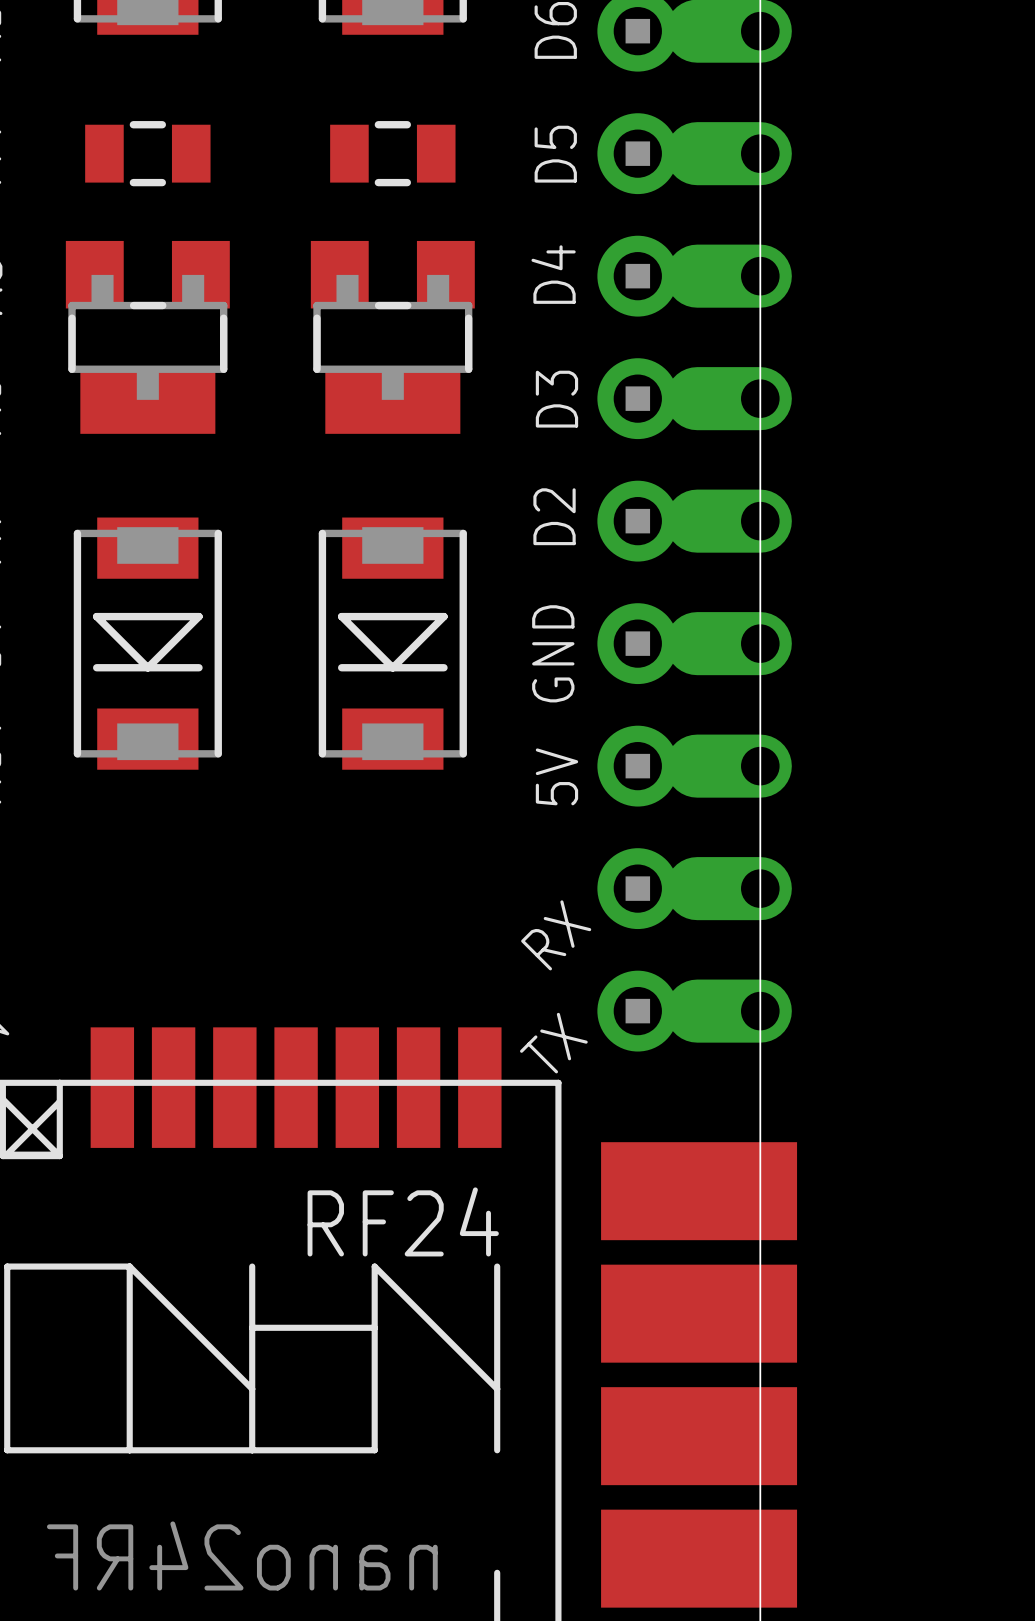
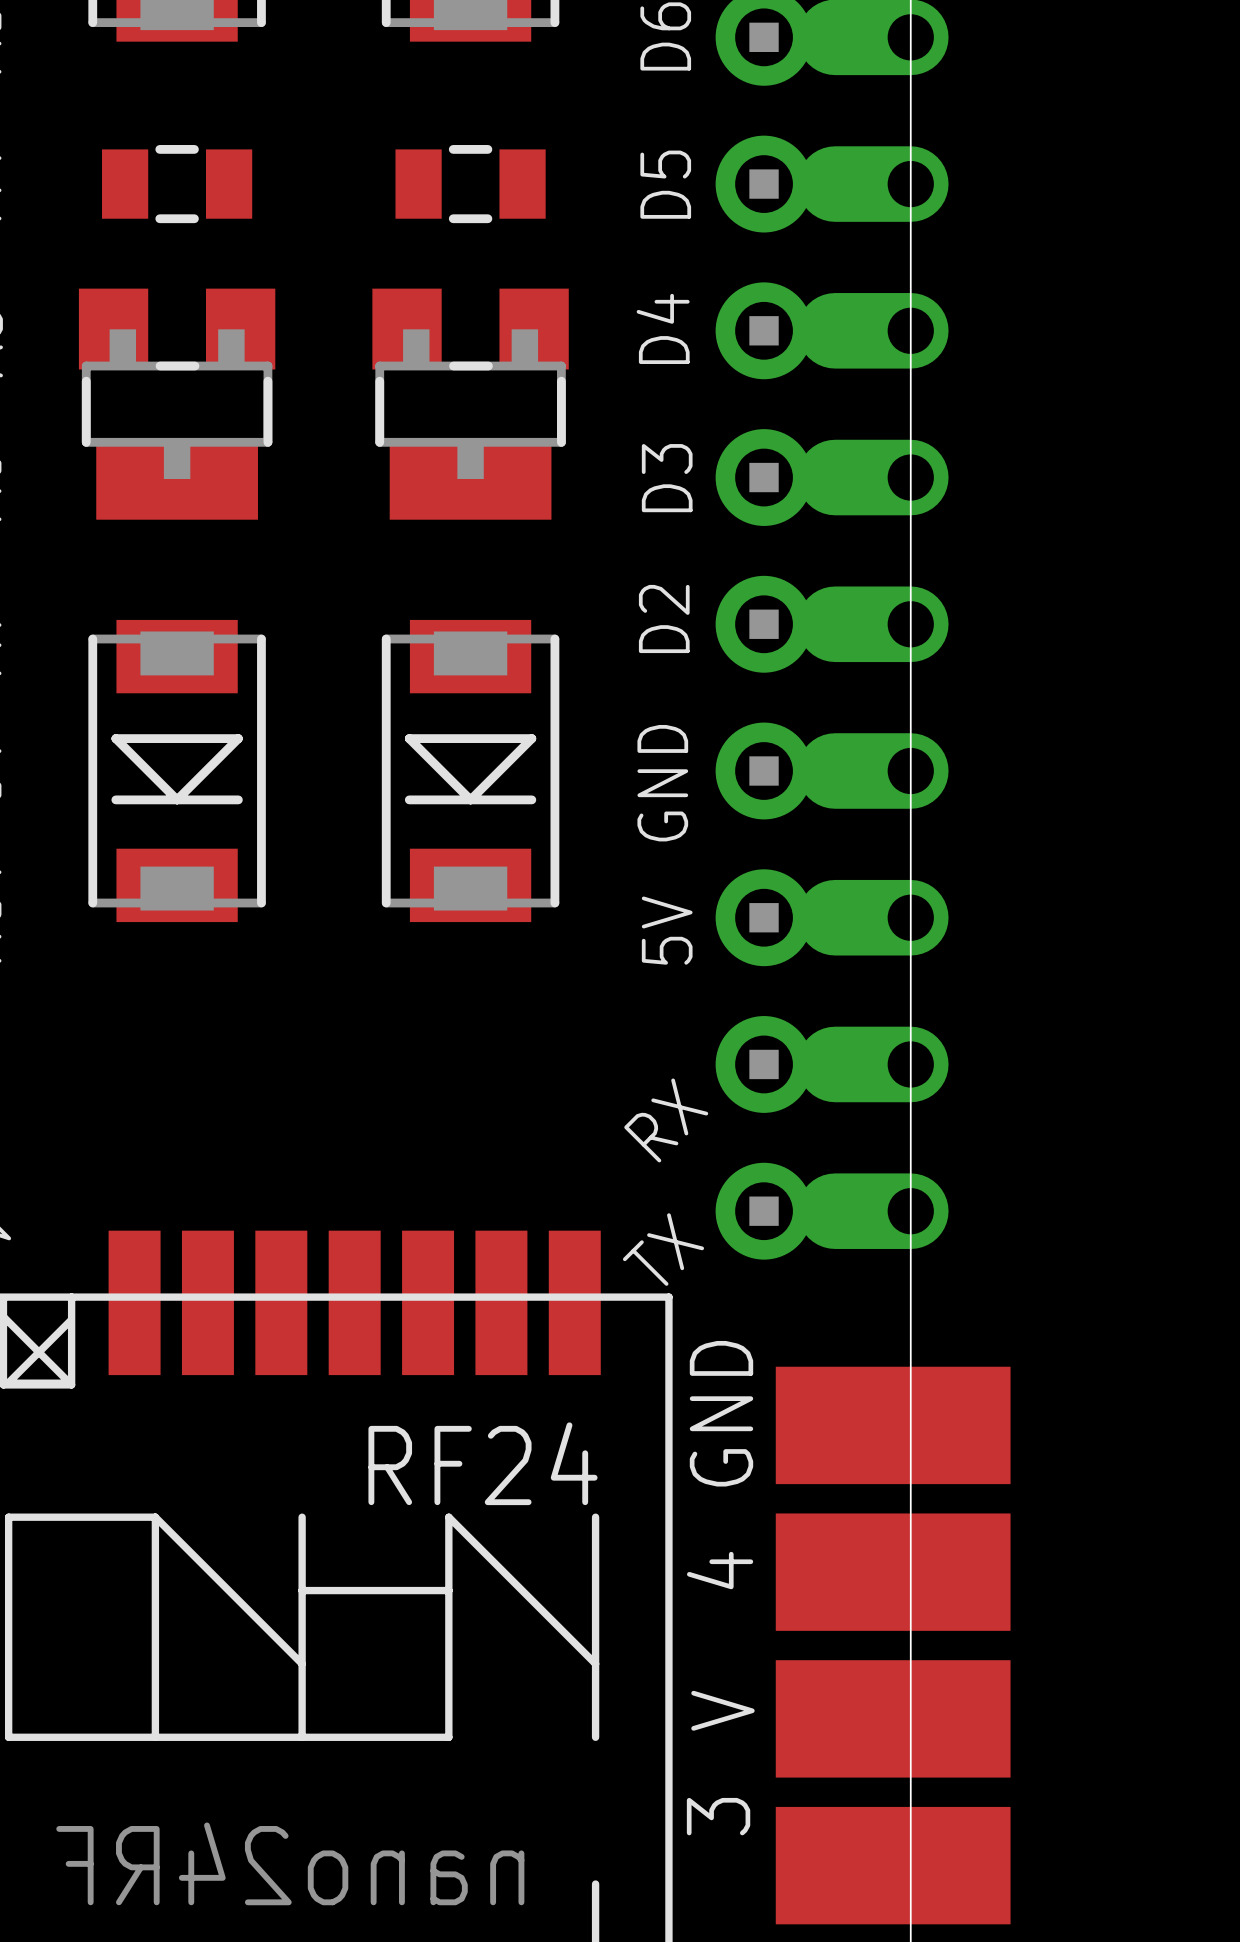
text: none -> GND (721, 1413)
text: none -> 4 (720, 1570)
part position: (699, 1374) -> (893, 1645)
text: none -> V (722, 1710)
text: none -> 3 (718, 1816)

